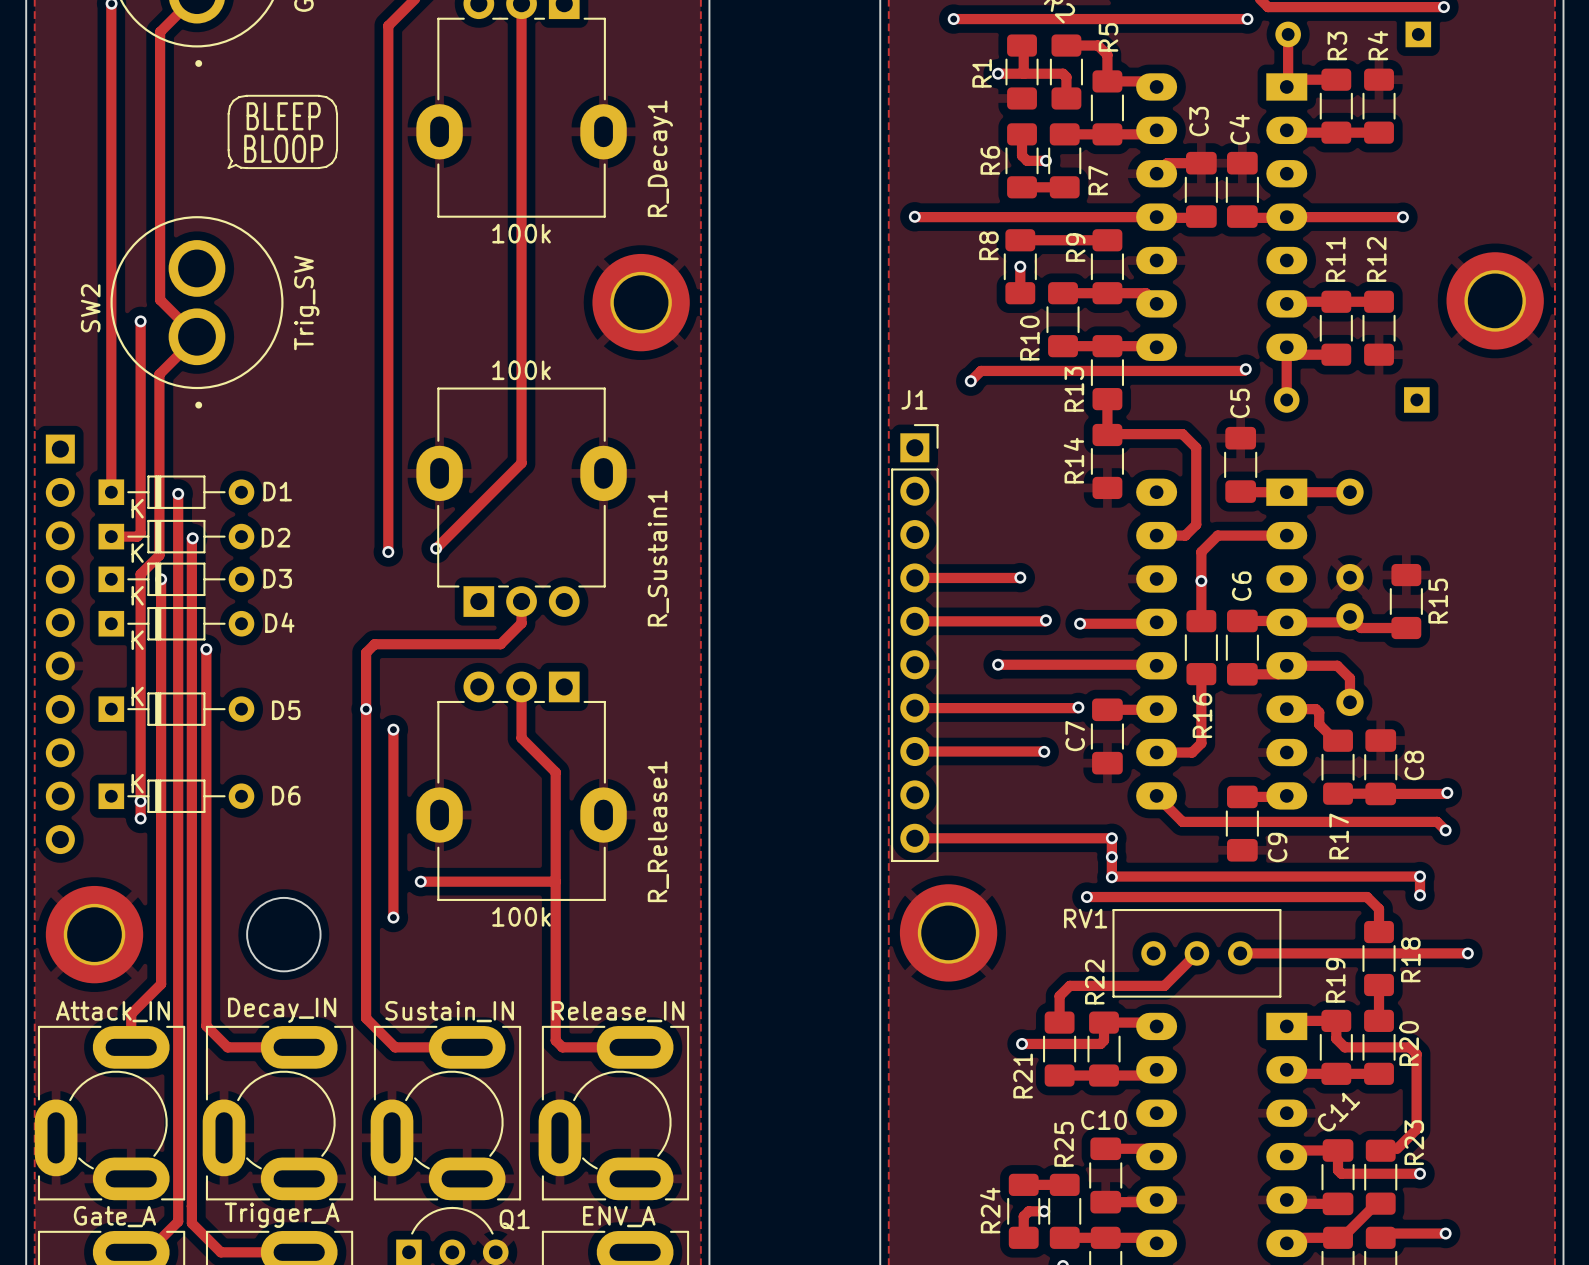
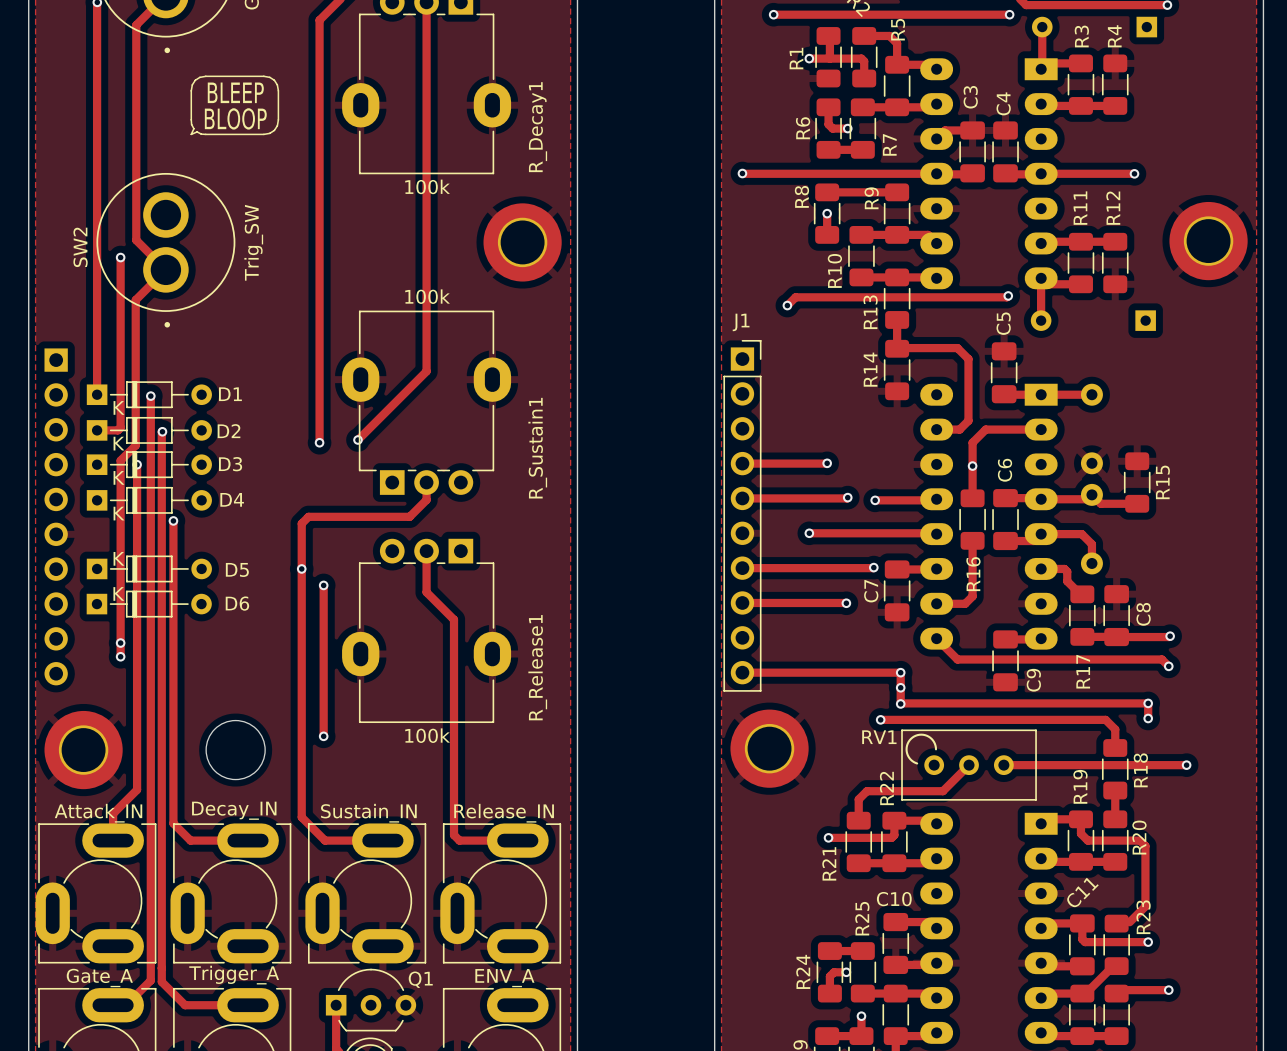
D6 position: (176, 796) -> (149, 604)
track: (420, 881) (555, 881) -> none
via: (420, 881) -> none
line: none -> (936, 749) (932, 740) (926, 735) (919, 734) (912, 737) (907, 743) (907, 752) (910, 759) (917, 763)

